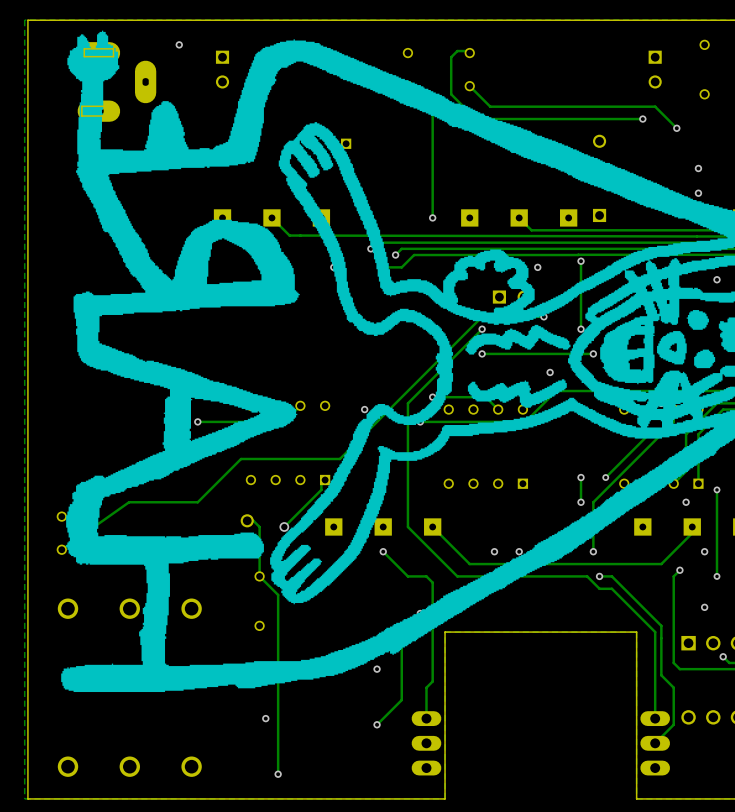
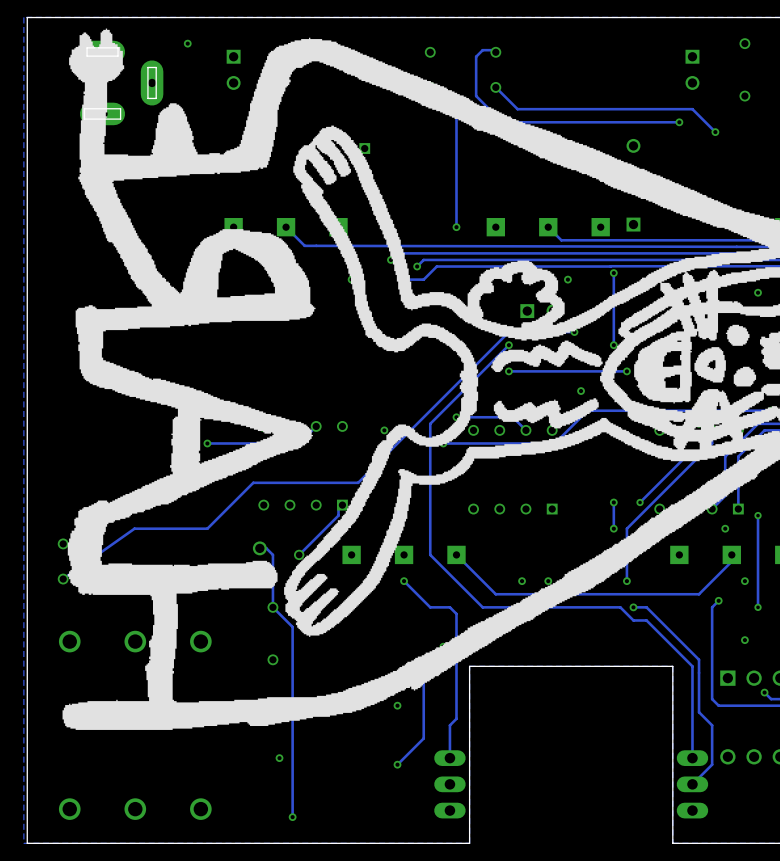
via: (698, 168) -> none
via: (698, 193) -> none

